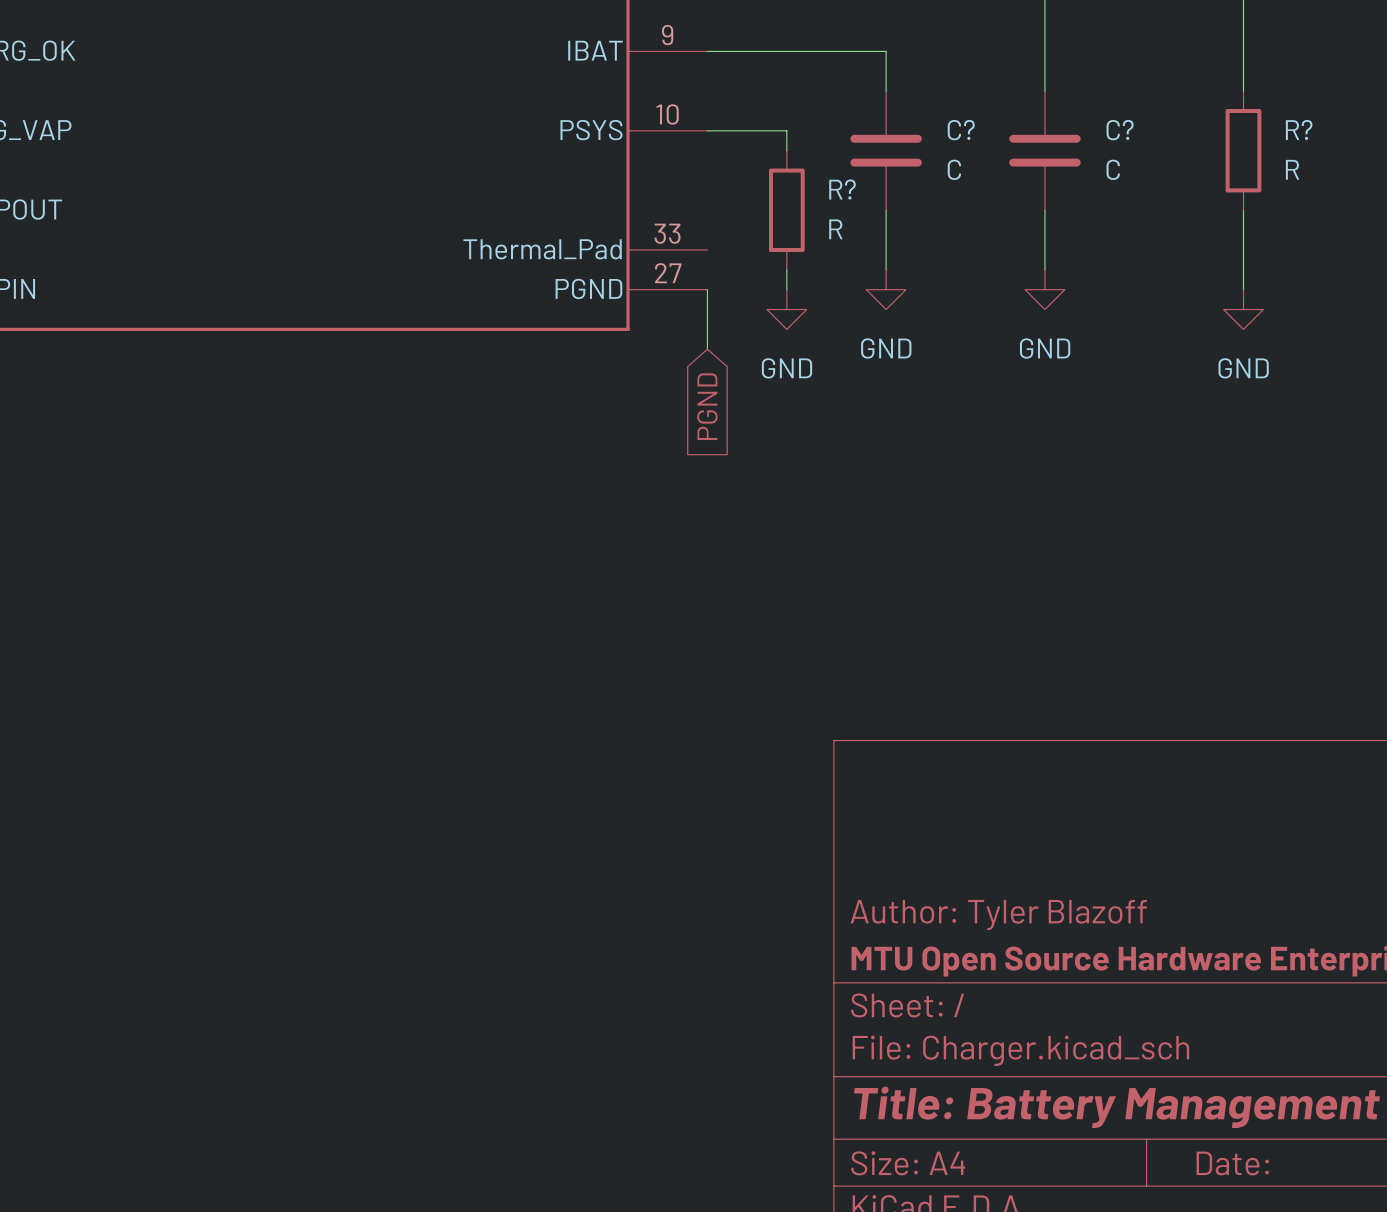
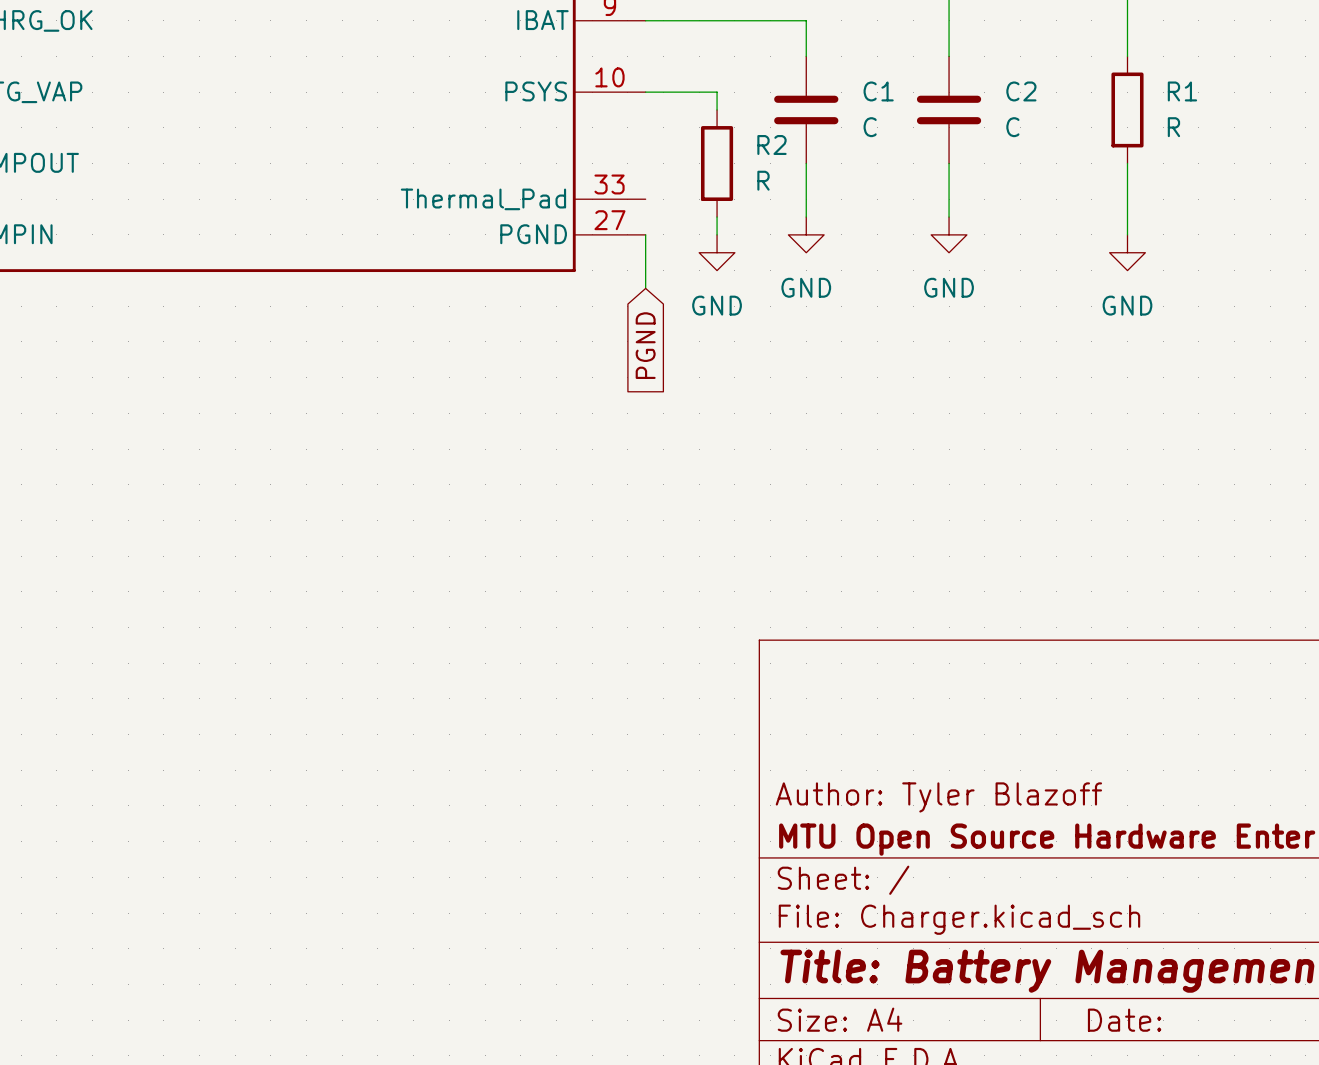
R? name: R? (1299, 129) -> R1 (1182, 91)
C? name: C? (961, 130) -> C1 (878, 91)
C? name: C? (1120, 130) -> C2 (1021, 91)
R? name: R? (842, 189) -> R2 (771, 145)

